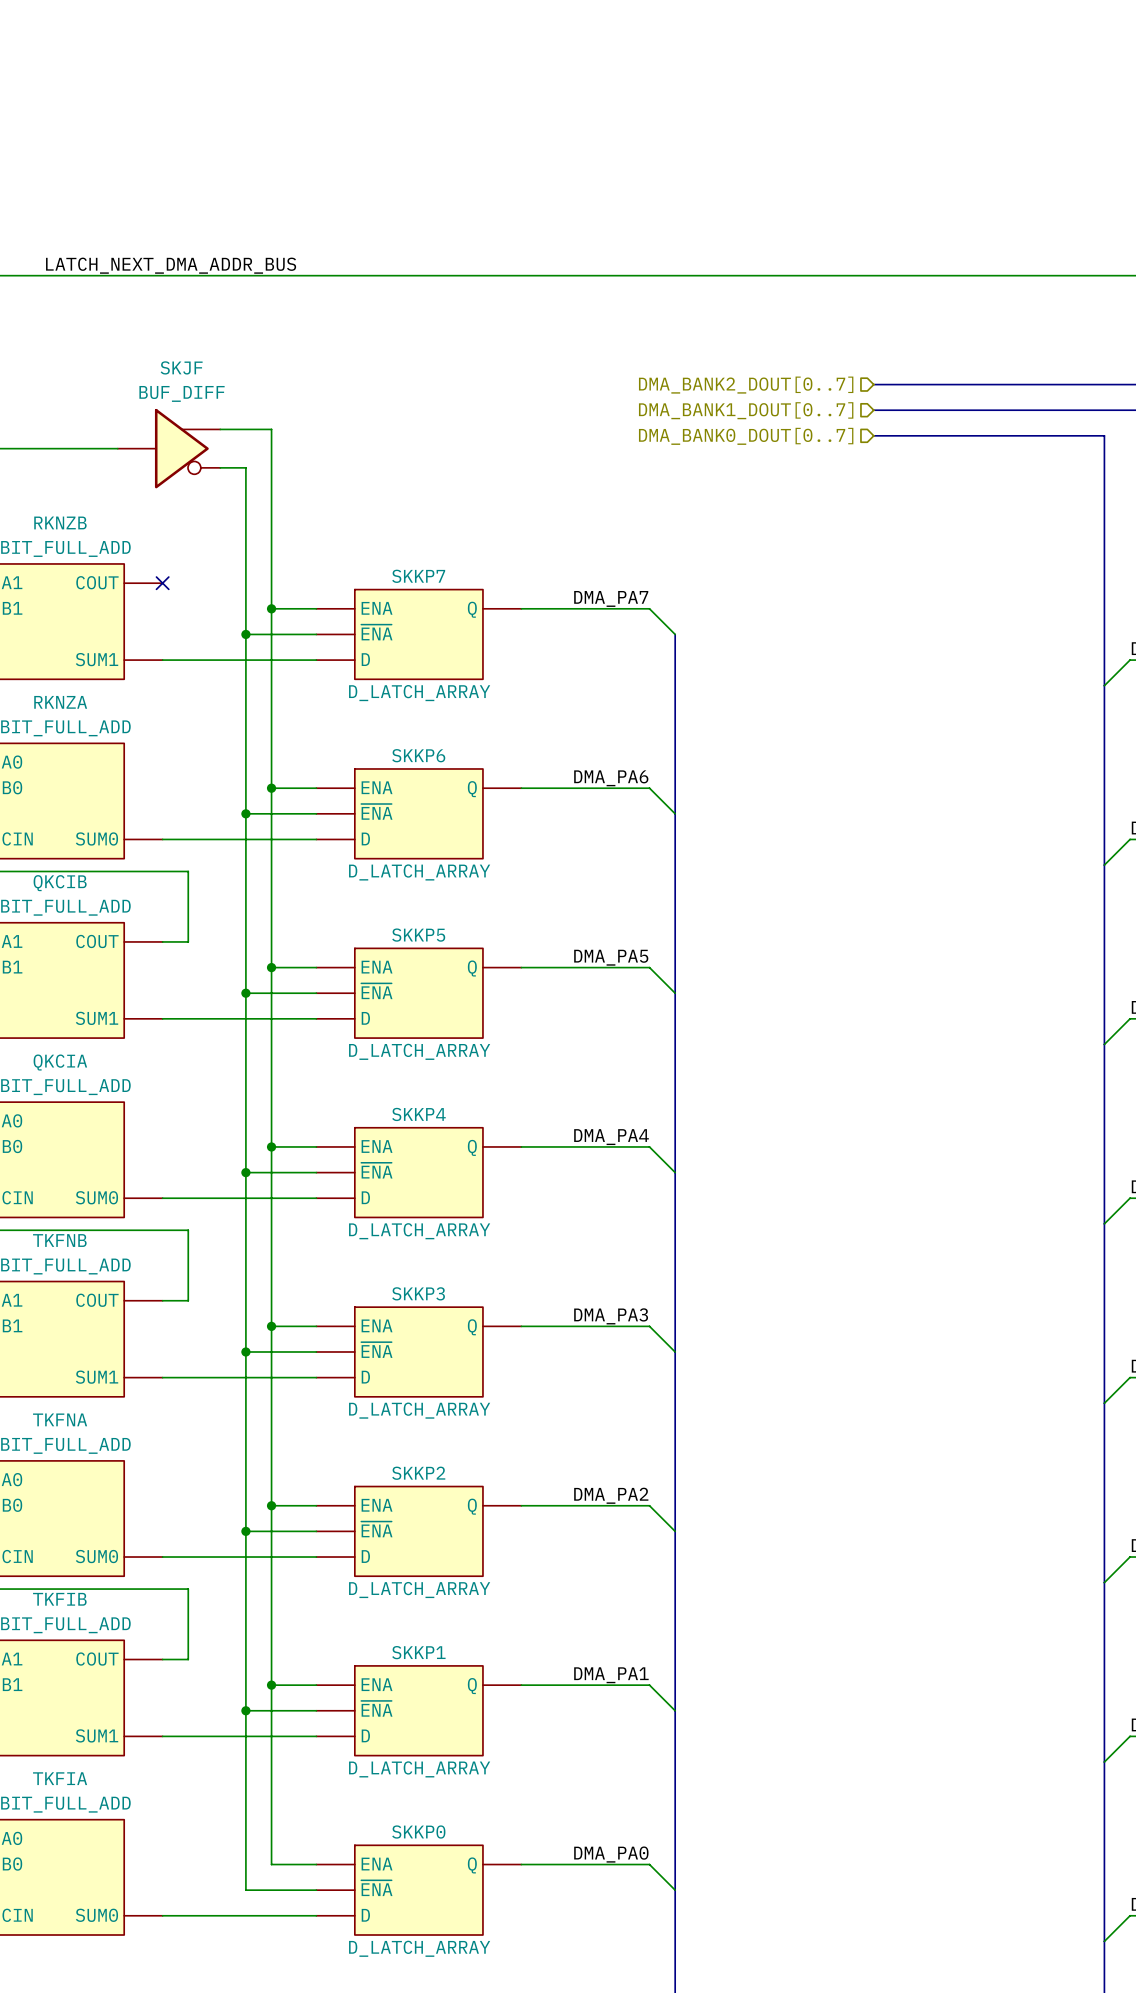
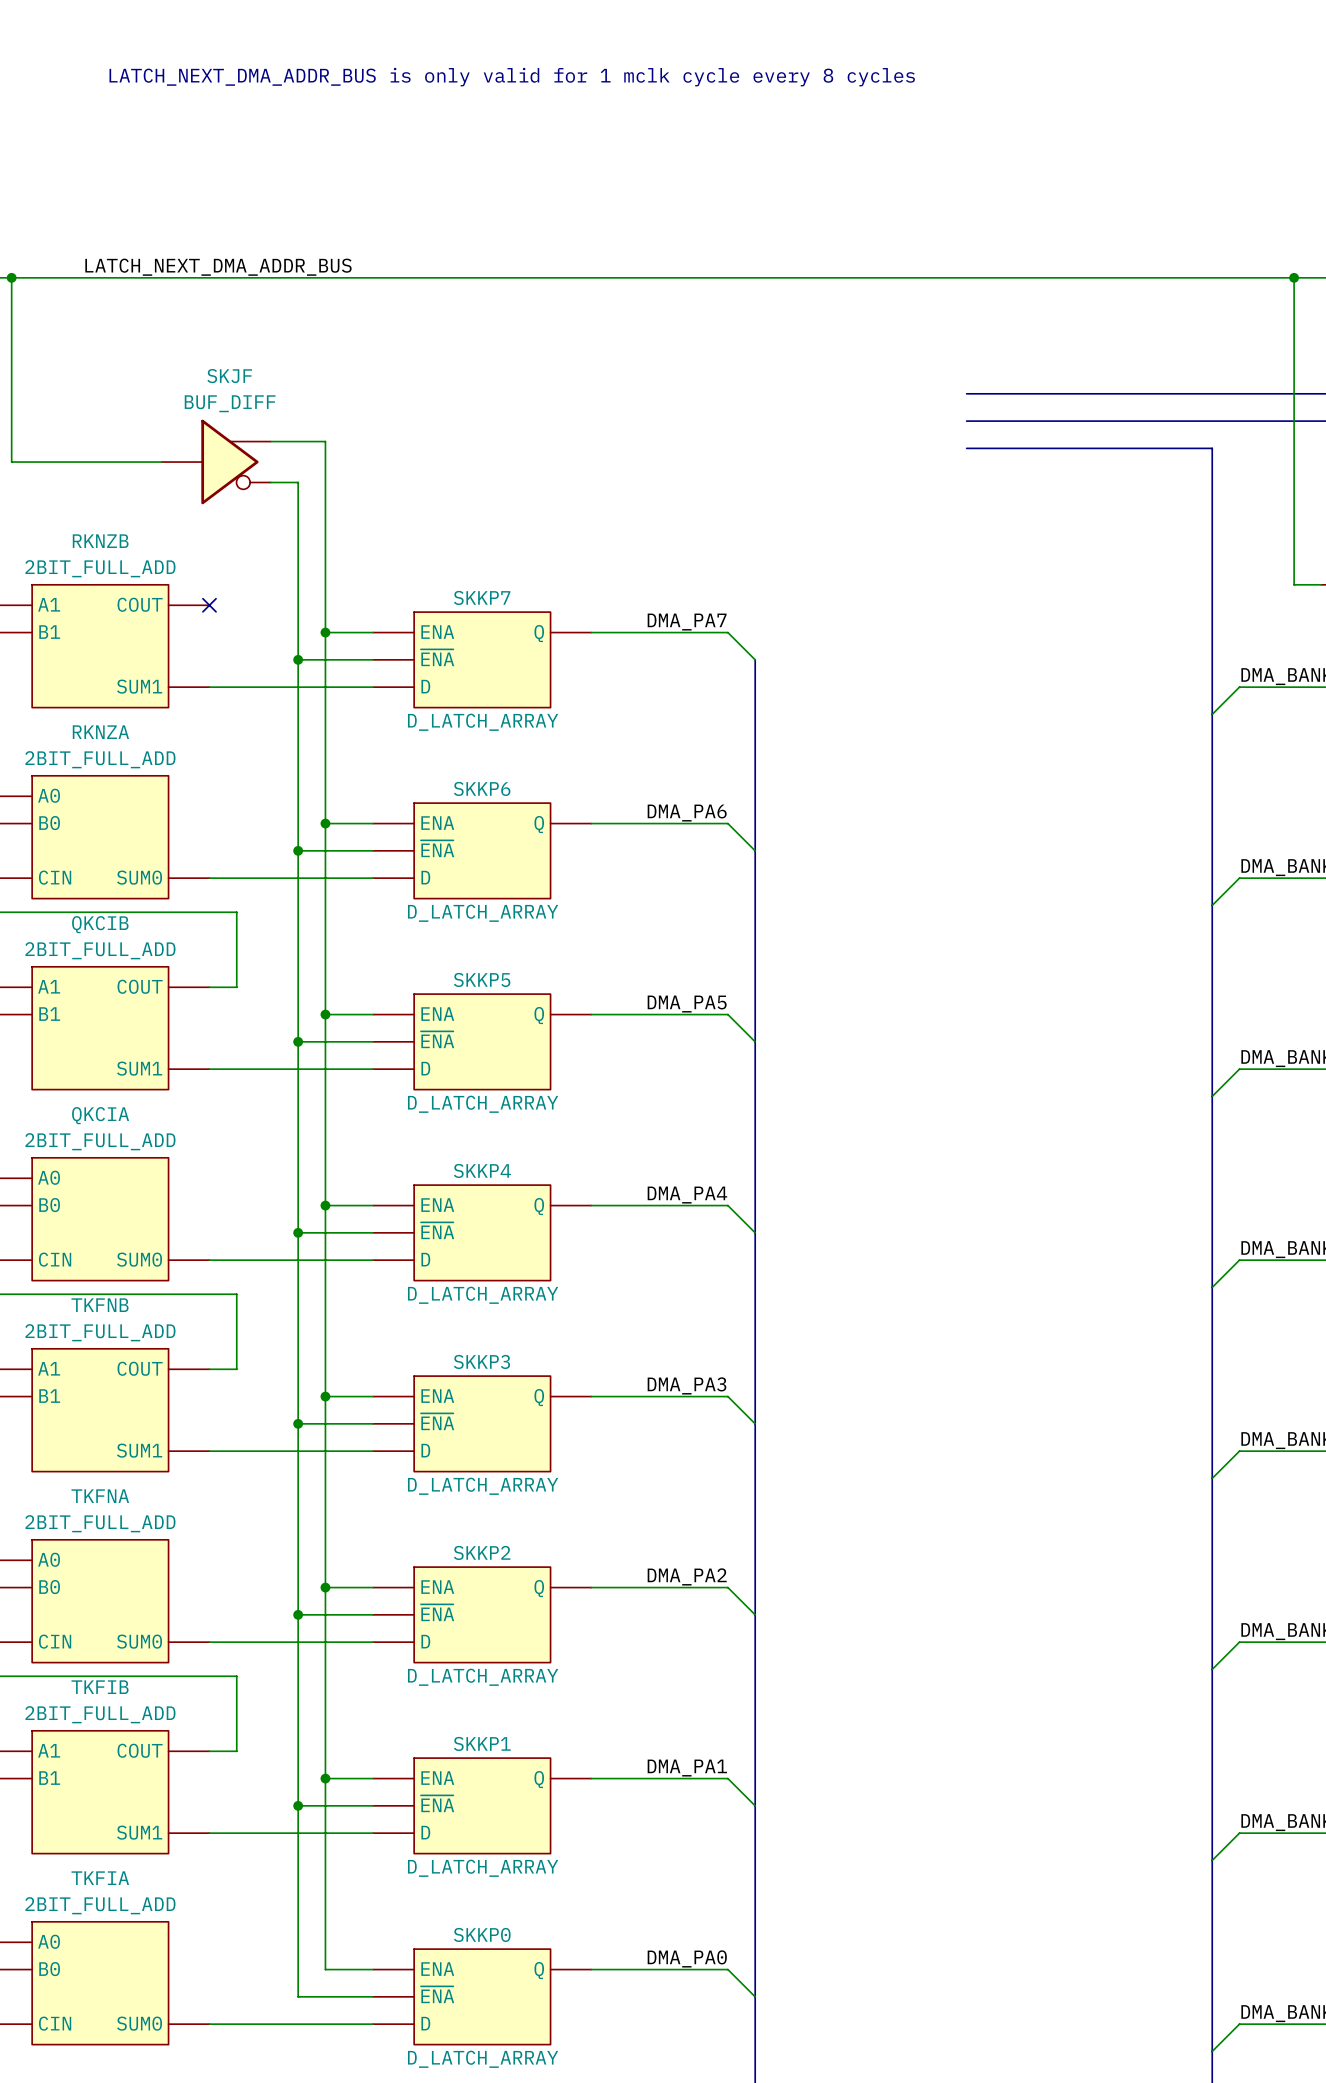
text: none -> LATCH_NEXT_DMA_ADDR_BUS is only valid for 1 mclk cycle every 8 cycles (512, 77)
hierarchical label: DMA_BANK2_DOUT[0..7] (746, 385) -> none
hierarchical label: DMA_BANK1_DOUT[0..7] (746, 410) -> none
hierarchical label: DMA_BANK0_DOUT[0..7] (746, 436) -> none

